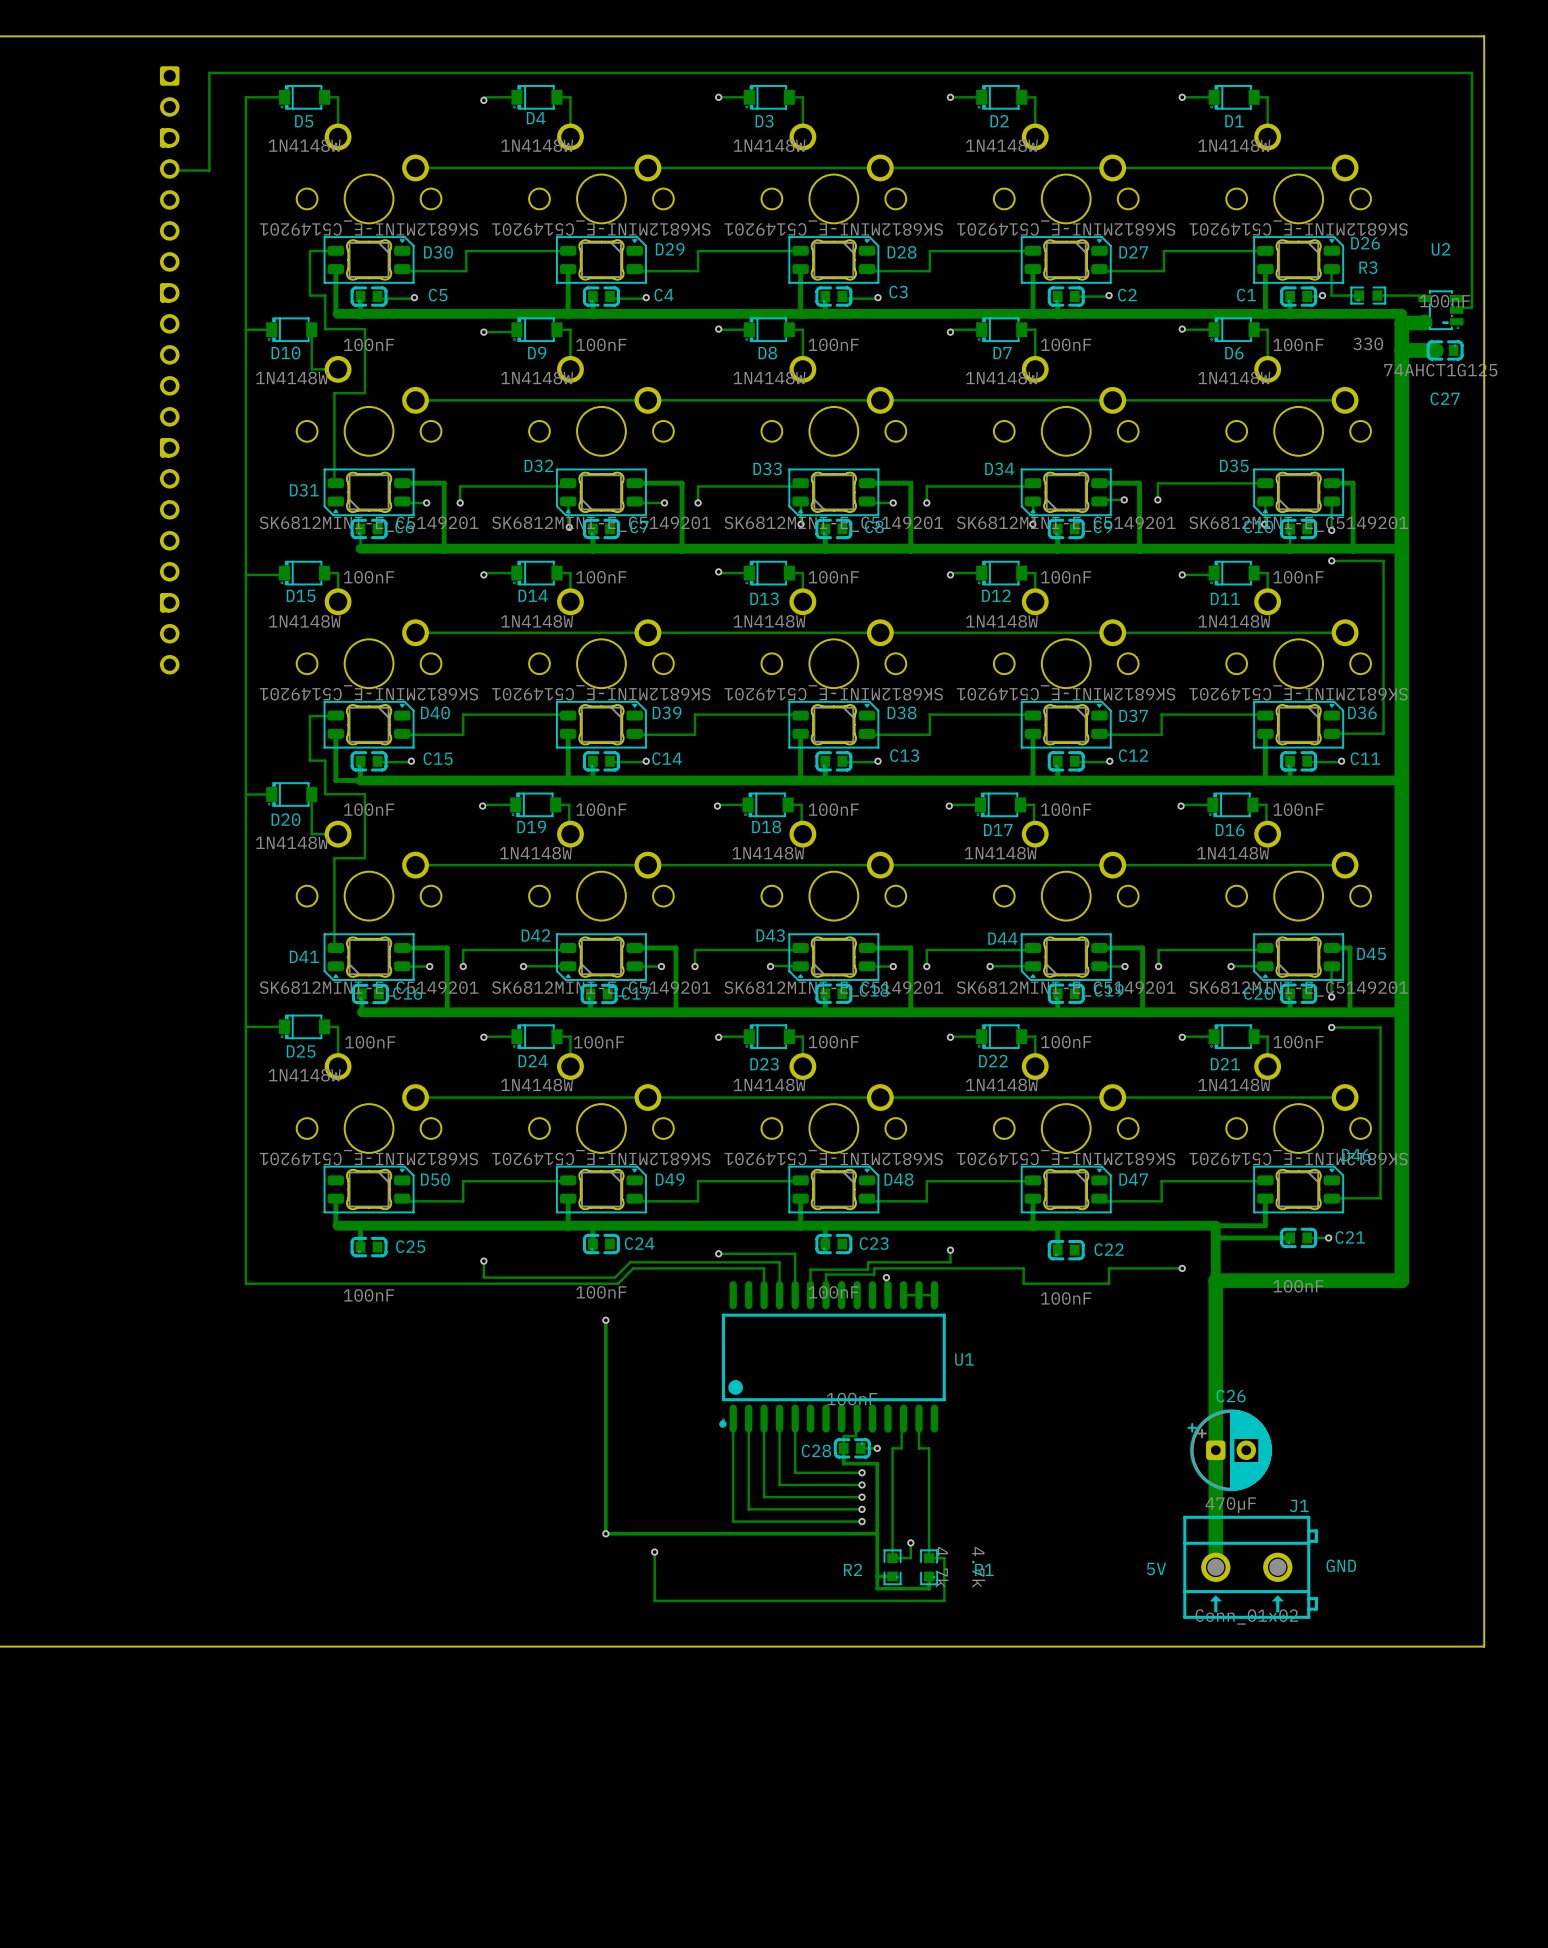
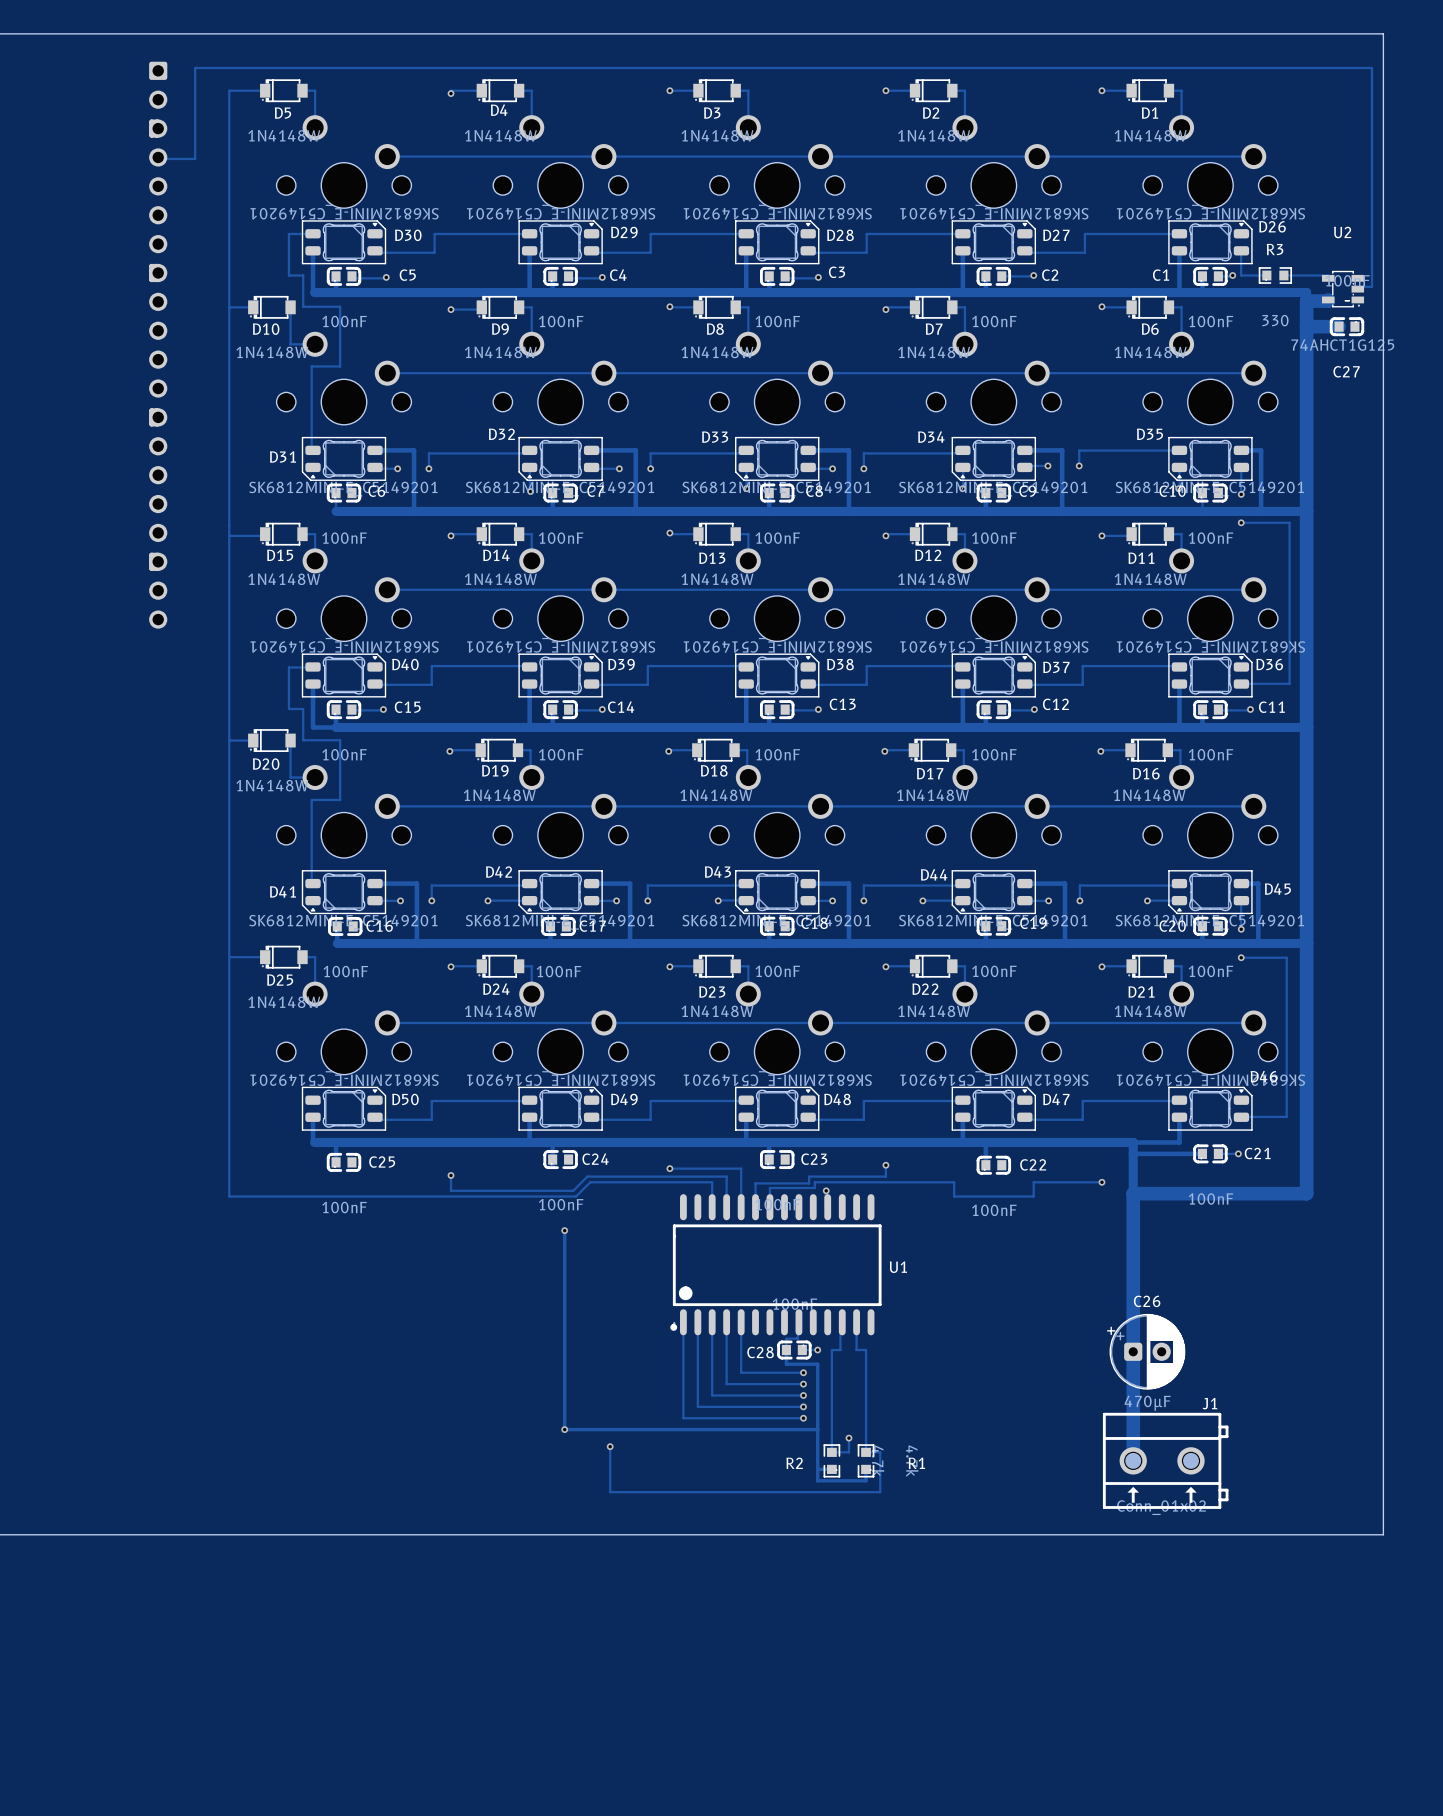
track: (934, 1295) (903, 1295) -> none
text: GND (1341, 1565) -> none
text: 5V (1156, 1568) -> none

